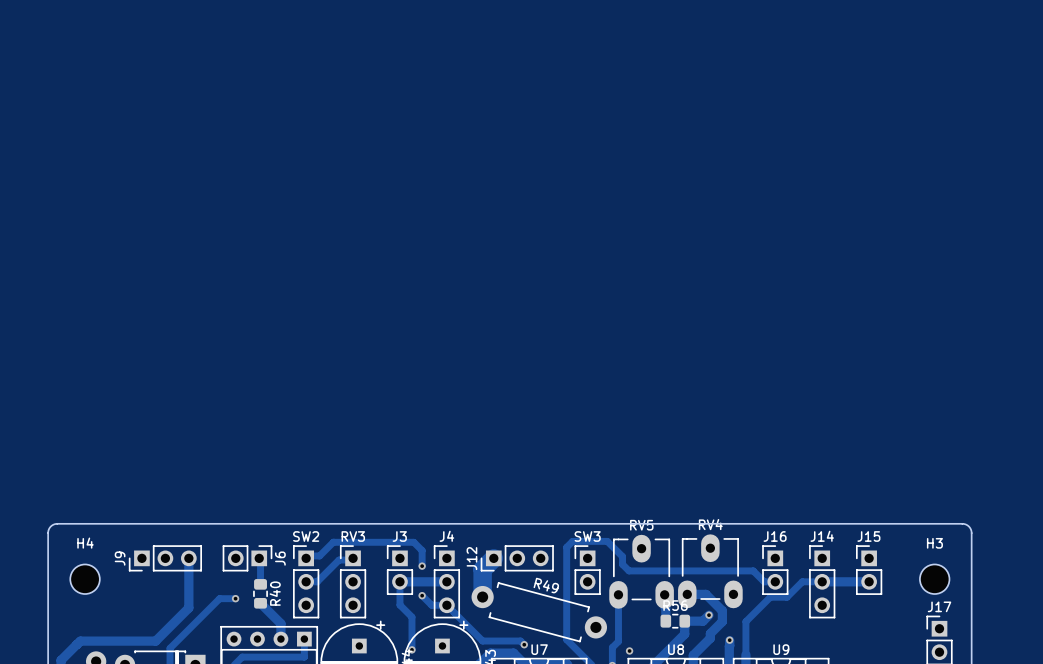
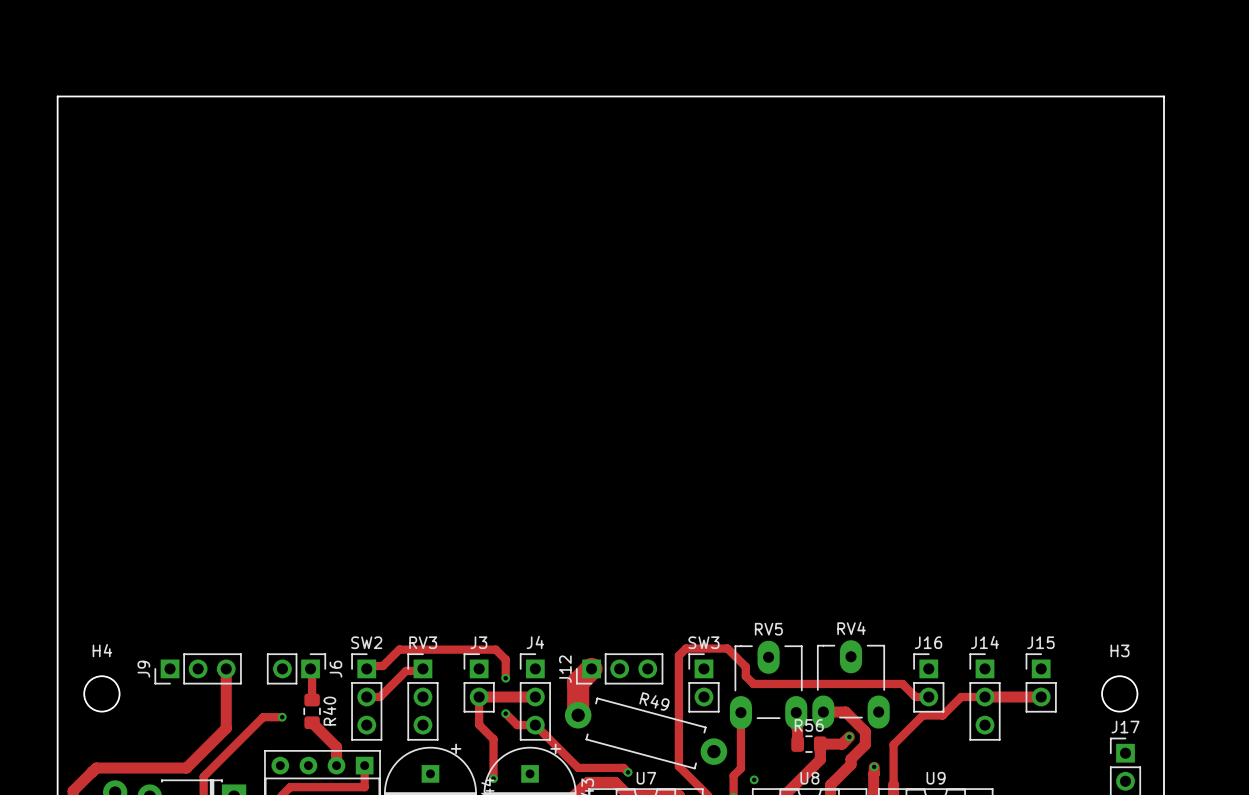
board edge: (48, 533) (50, 526) (57, 523) (962, 523) (968, 526) (971, 533) -> (57, 638) (57, 96) (1164, 96) (1164, 638)

